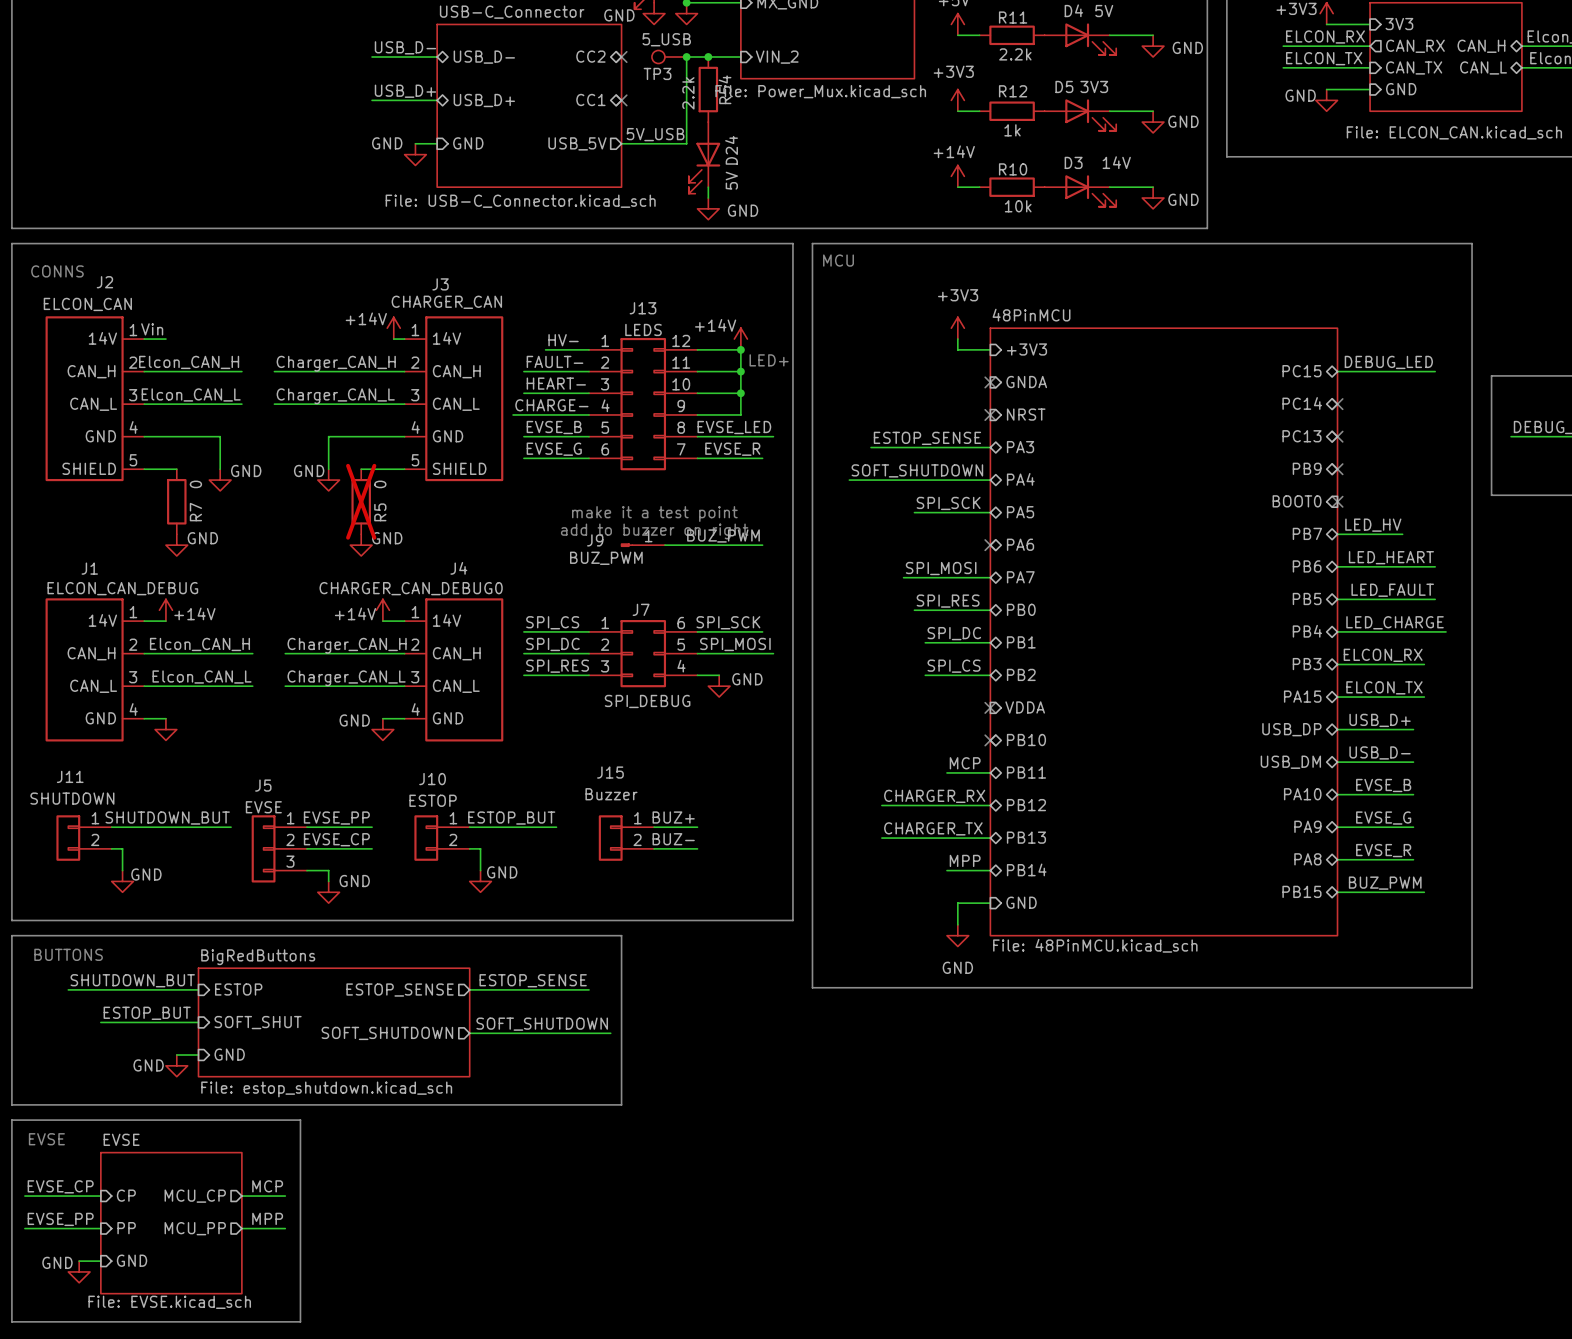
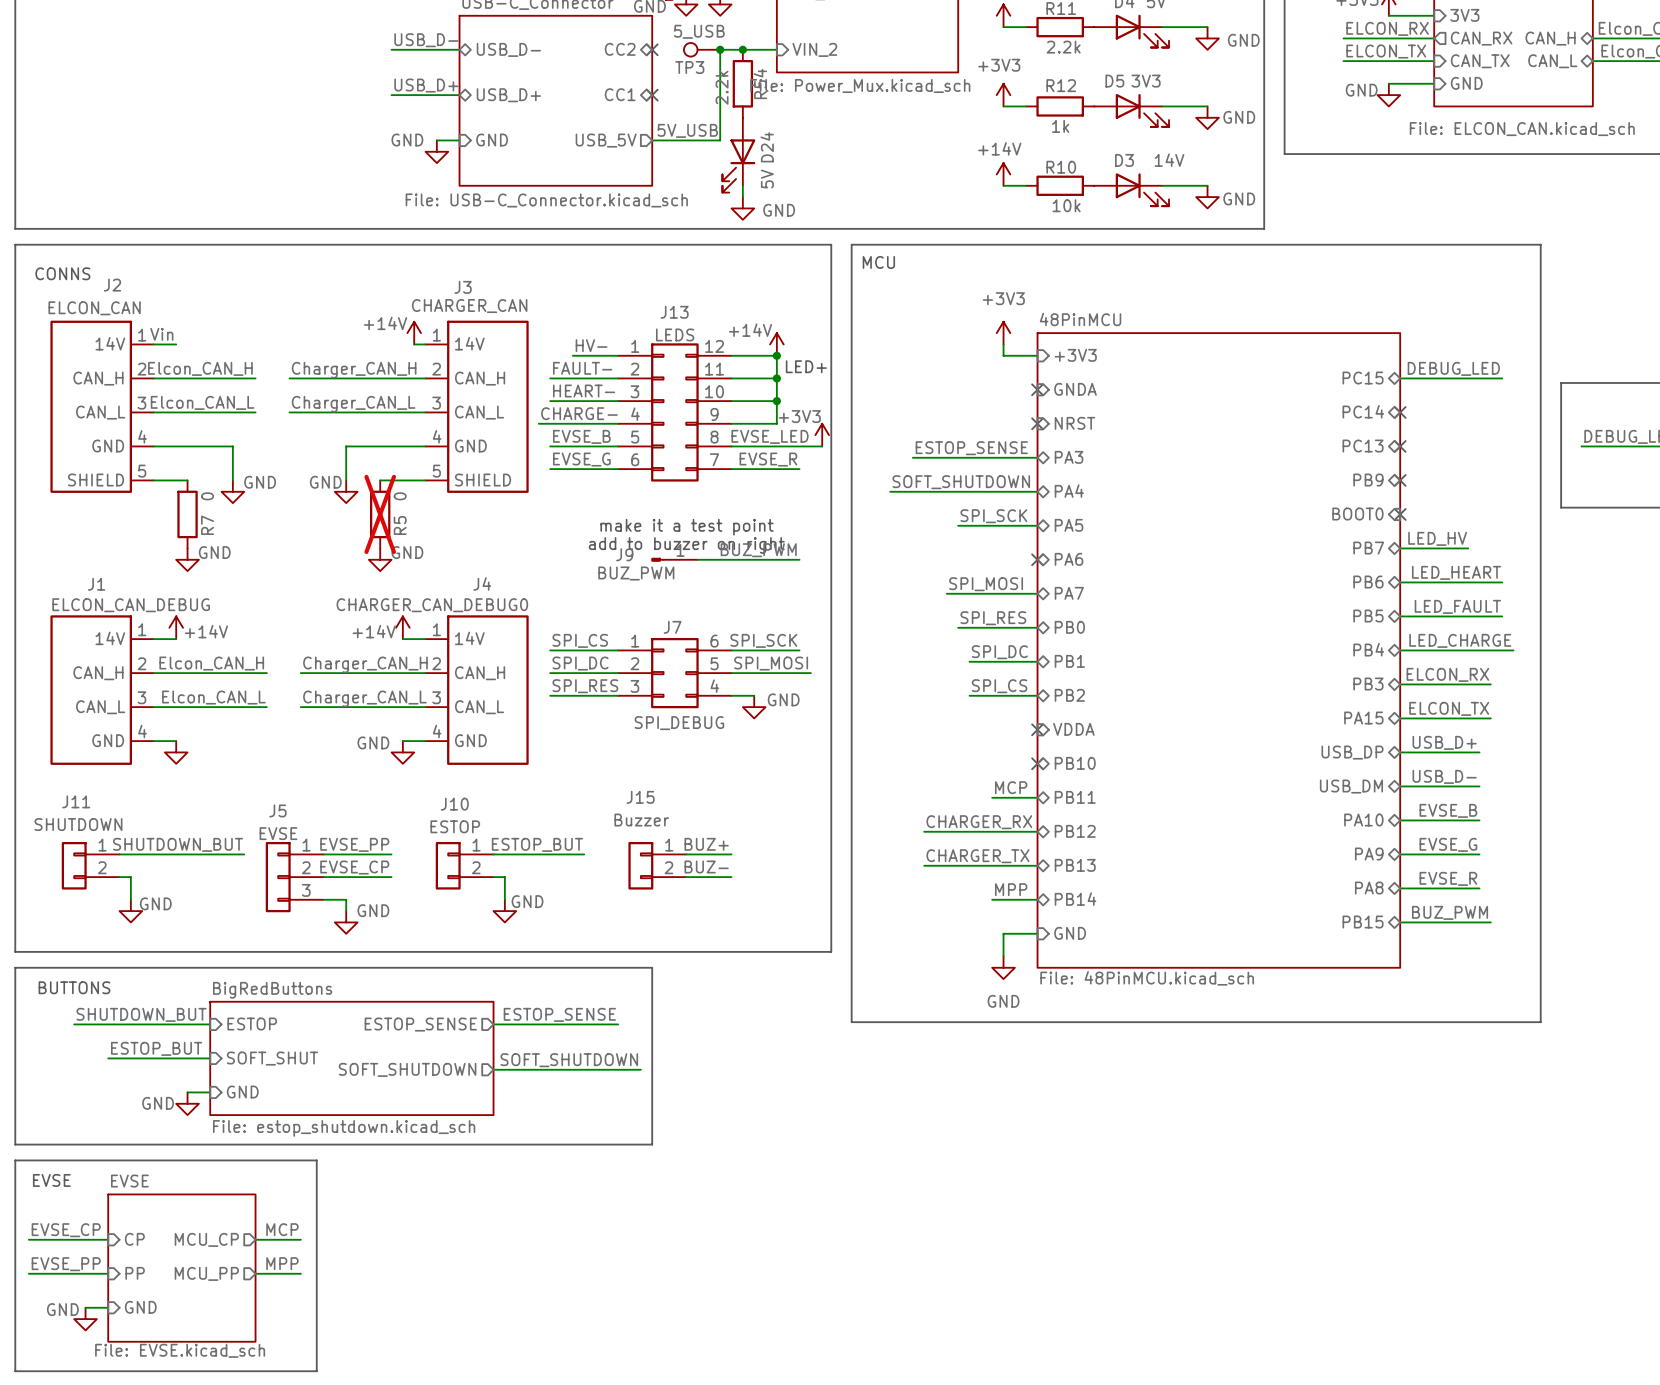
power symbol: none -> +3V3 (822, 435)
wire: none -> (810, 446) (822, 446)

